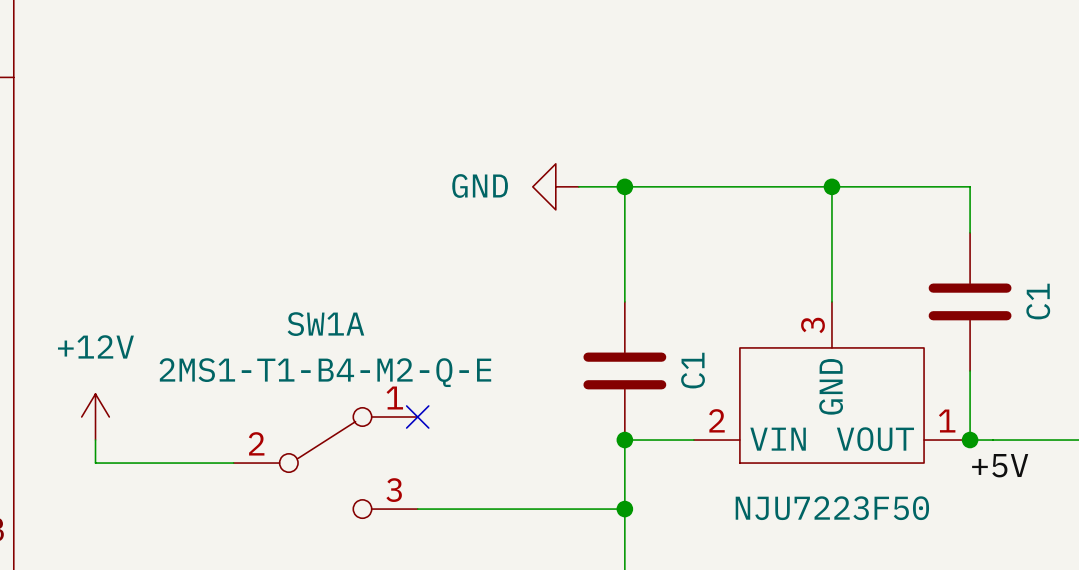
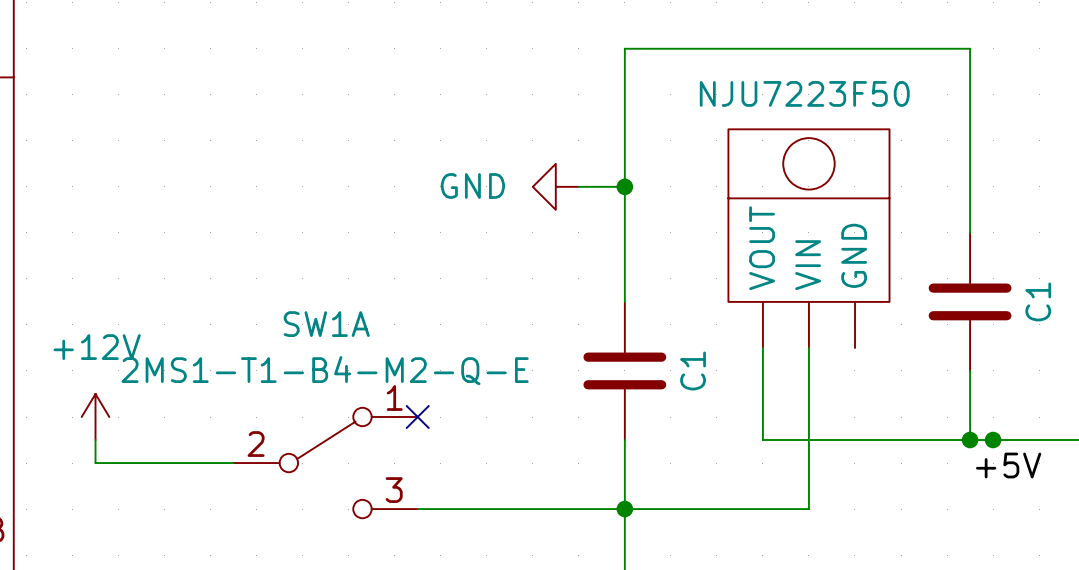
wire: (624, 186) (970, 186) -> (624, 186) (624, 48) (970, 48) (970, 186)
wire: (831, 186) (831, 301) -> none
junction: (831, 186) -> none
NJU7223F50 symbol: [693, 301, 971, 464] -> [728, 129, 890, 348]
wire: none -> (762, 347) (762, 440) (970, 440)
wire: none -> (808, 347) (808, 509) (624, 509)
wire: (624, 440) (693, 440) -> none
junction: (624, 440) -> none
junction: none -> (993, 440)
NJU7223F50 name position: NJU7223F50 (832, 508) -> NJU7223F50 (804, 93)

